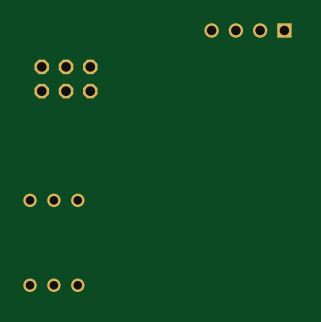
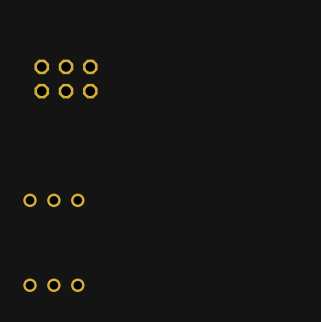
part: (248, 30) -> none

